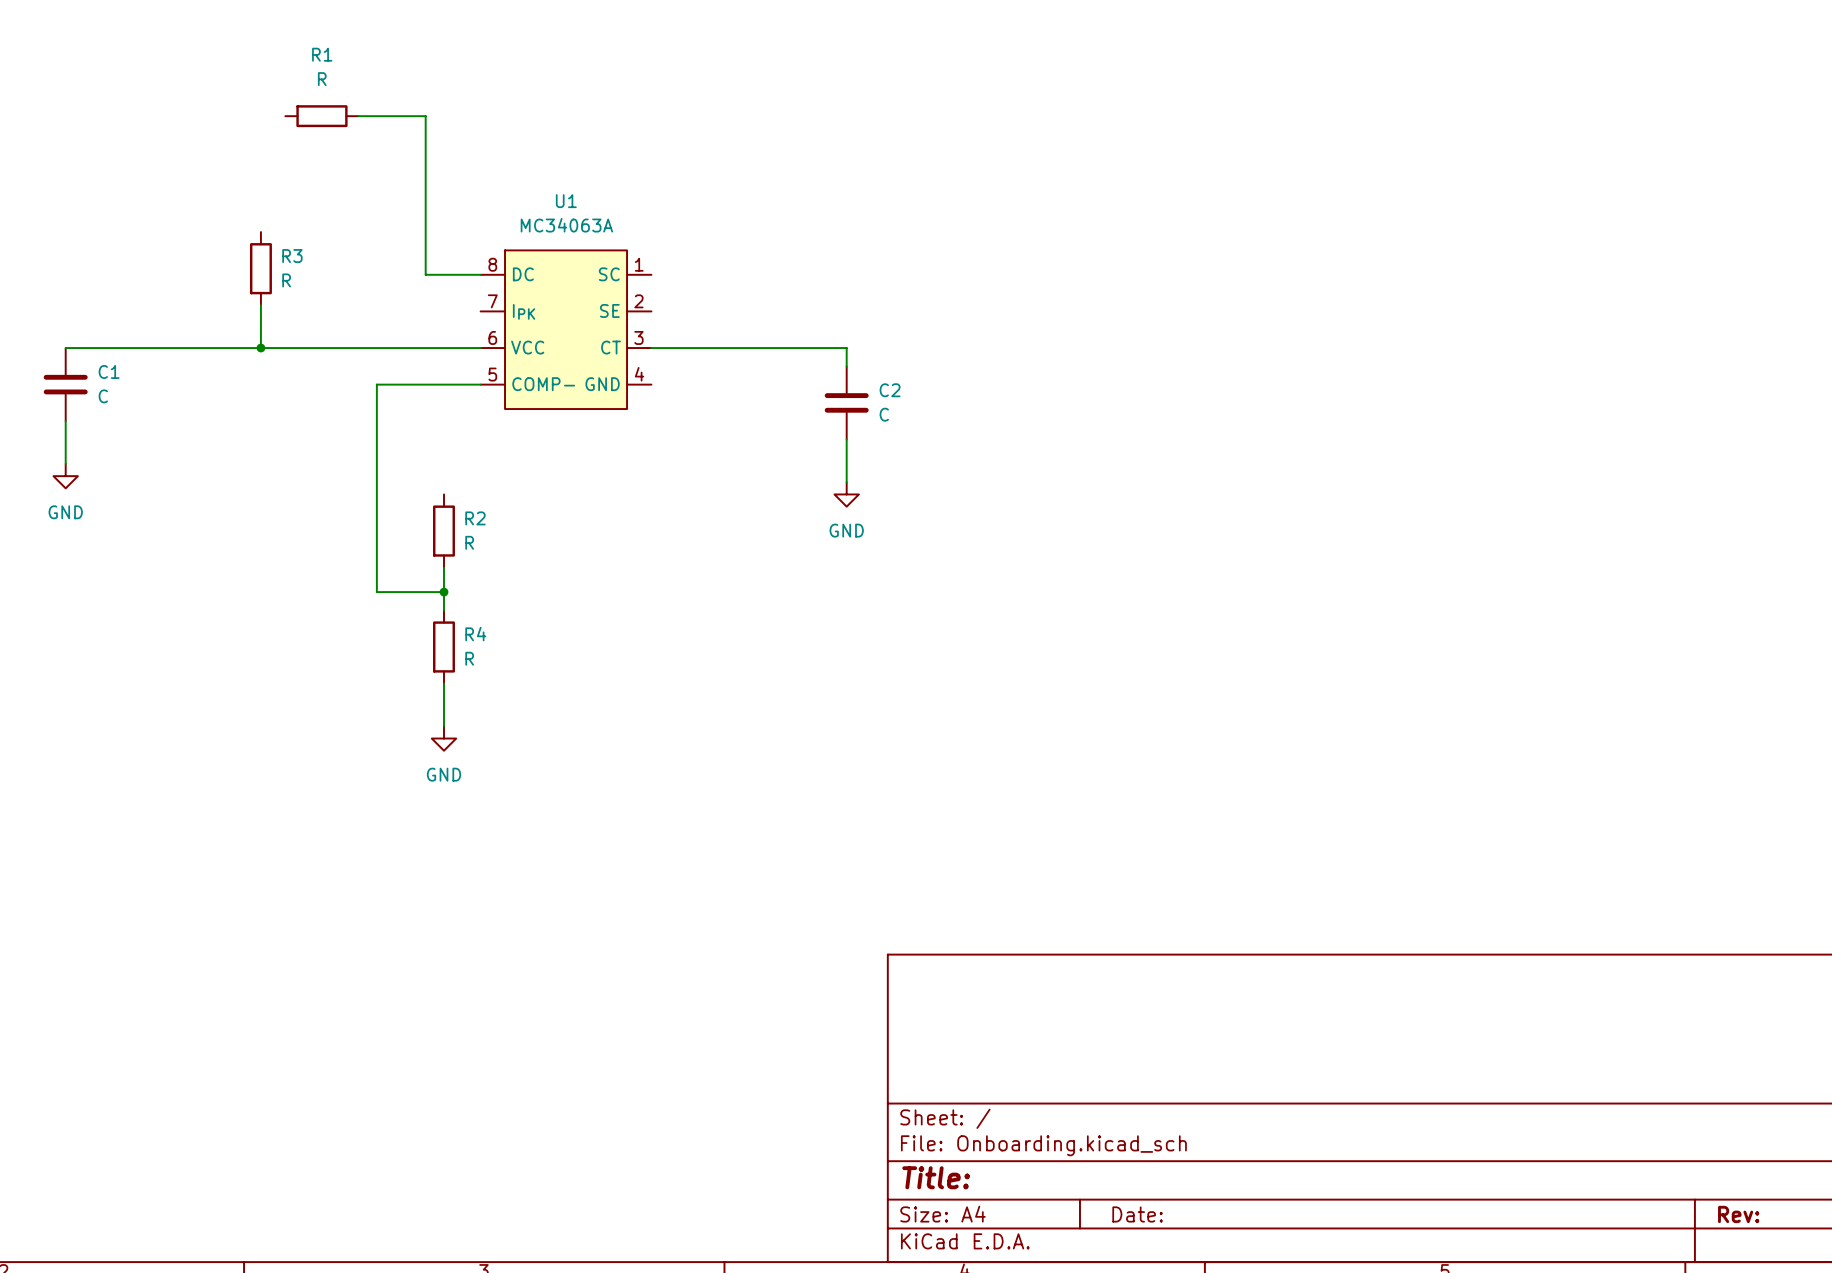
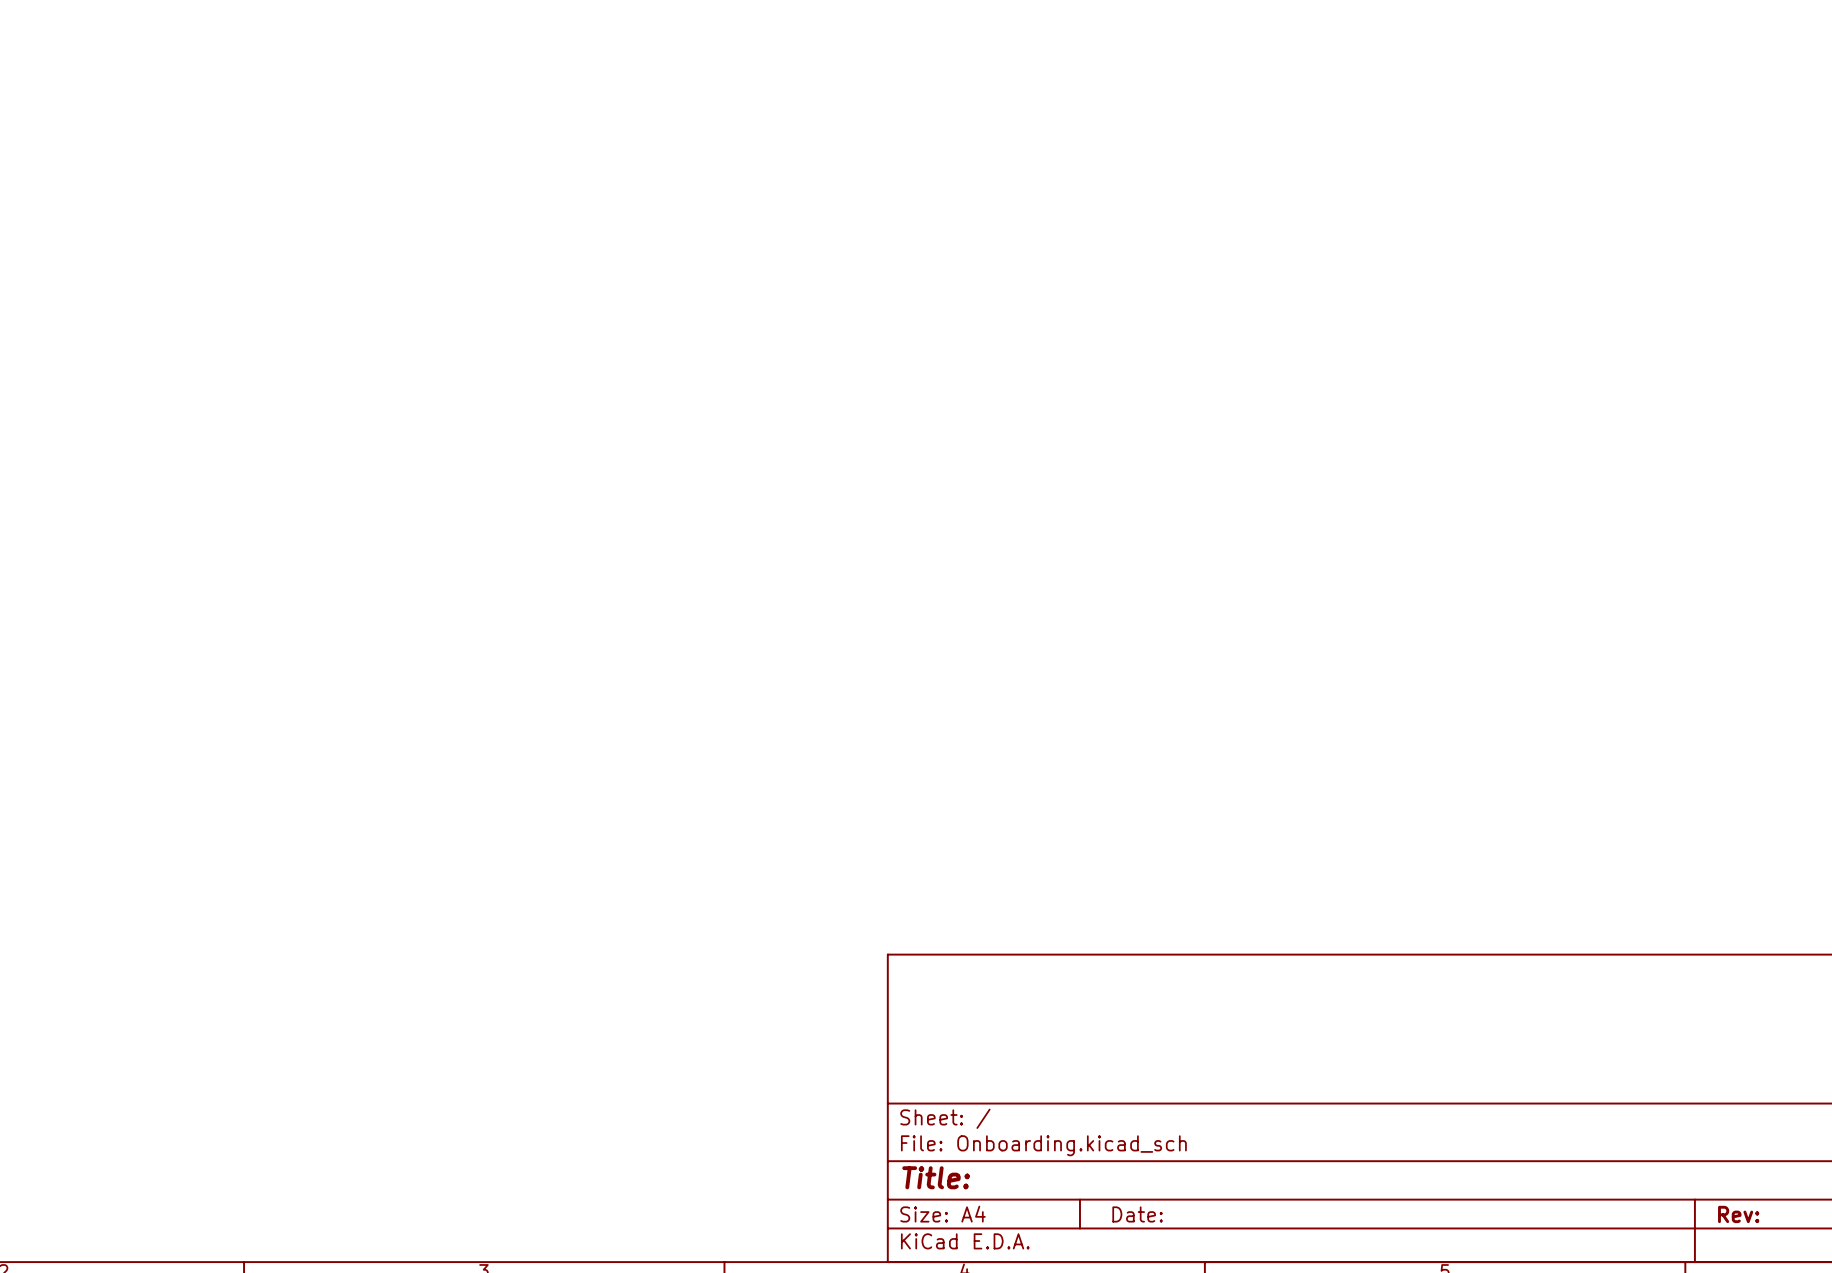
R1: R (321, 116) -> none
wire: (358, 116) (425, 116) (425, 274) (480, 274) -> none
R3: R (260, 268) -> none
wire: (260, 305) (260, 348) -> none
U1: MC34063A (566, 329) -> none
wire: (65, 348) (480, 348) -> none
junction: (260, 348) -> none
wire: (651, 348) (846, 348) (846, 366) -> none
C1: C (65, 384) -> none
wire: (480, 384) (376, 384) (376, 592) (443, 592) -> none
C2: C (846, 402) -> none
wire: (65, 421) (65, 463) -> none
wire: (846, 439) (846, 482) -> none
power symbol: GND (65, 476) -> none
power symbol: GND (846, 494) -> none
R2: R (443, 531) -> none
wire: (443, 567) (443, 610) -> none
junction: (443, 592) -> none
R4: R (443, 646) -> none
wire: (443, 683) (443, 726) -> none
power symbol: GND (443, 738) -> none

